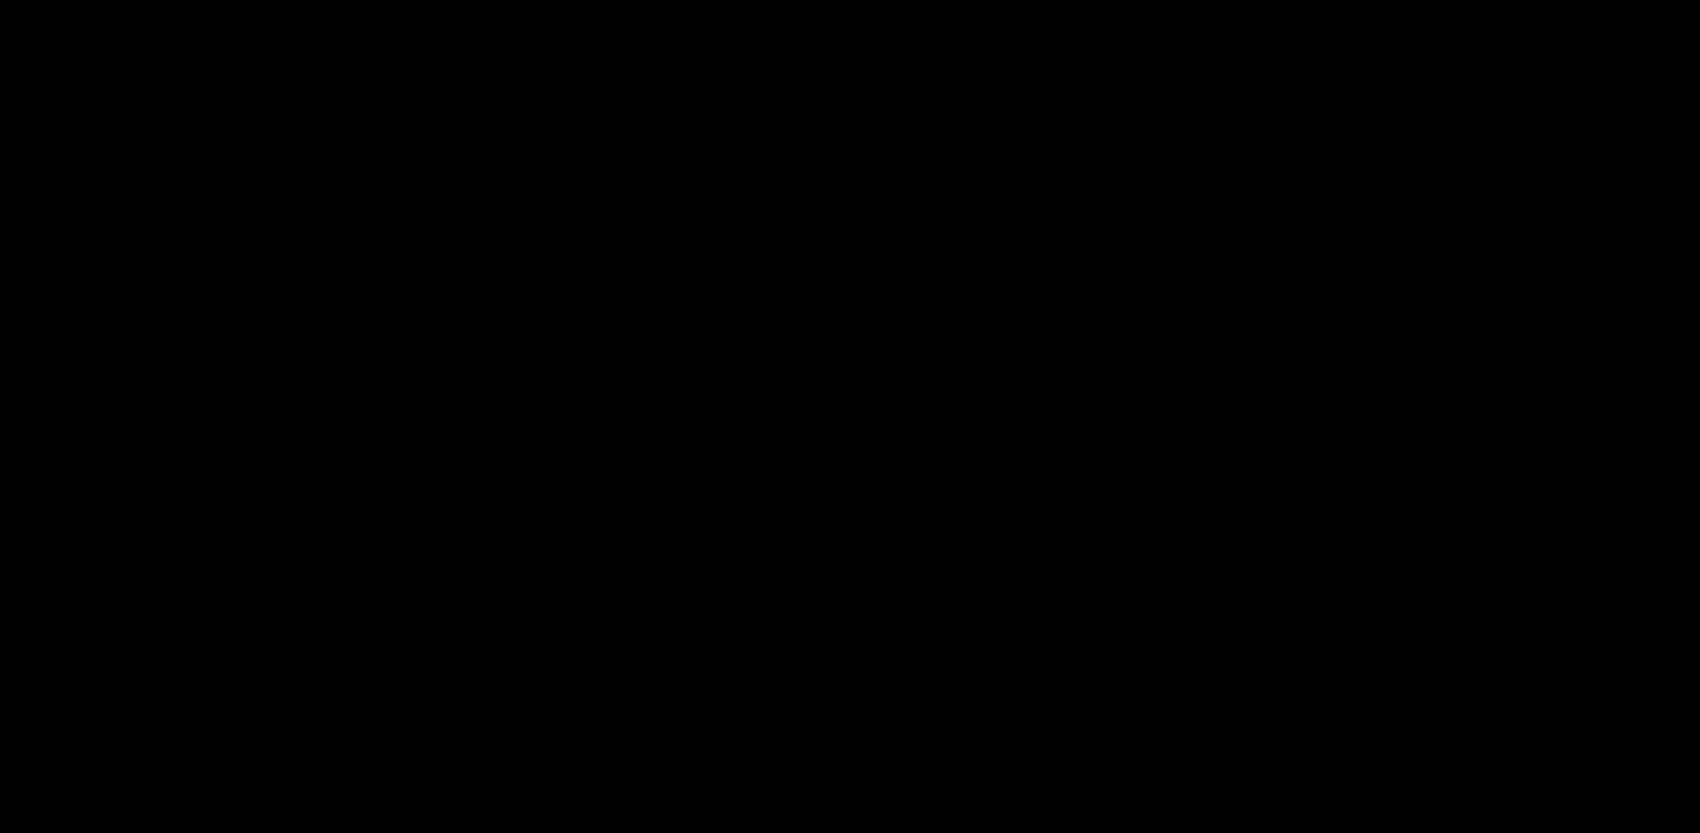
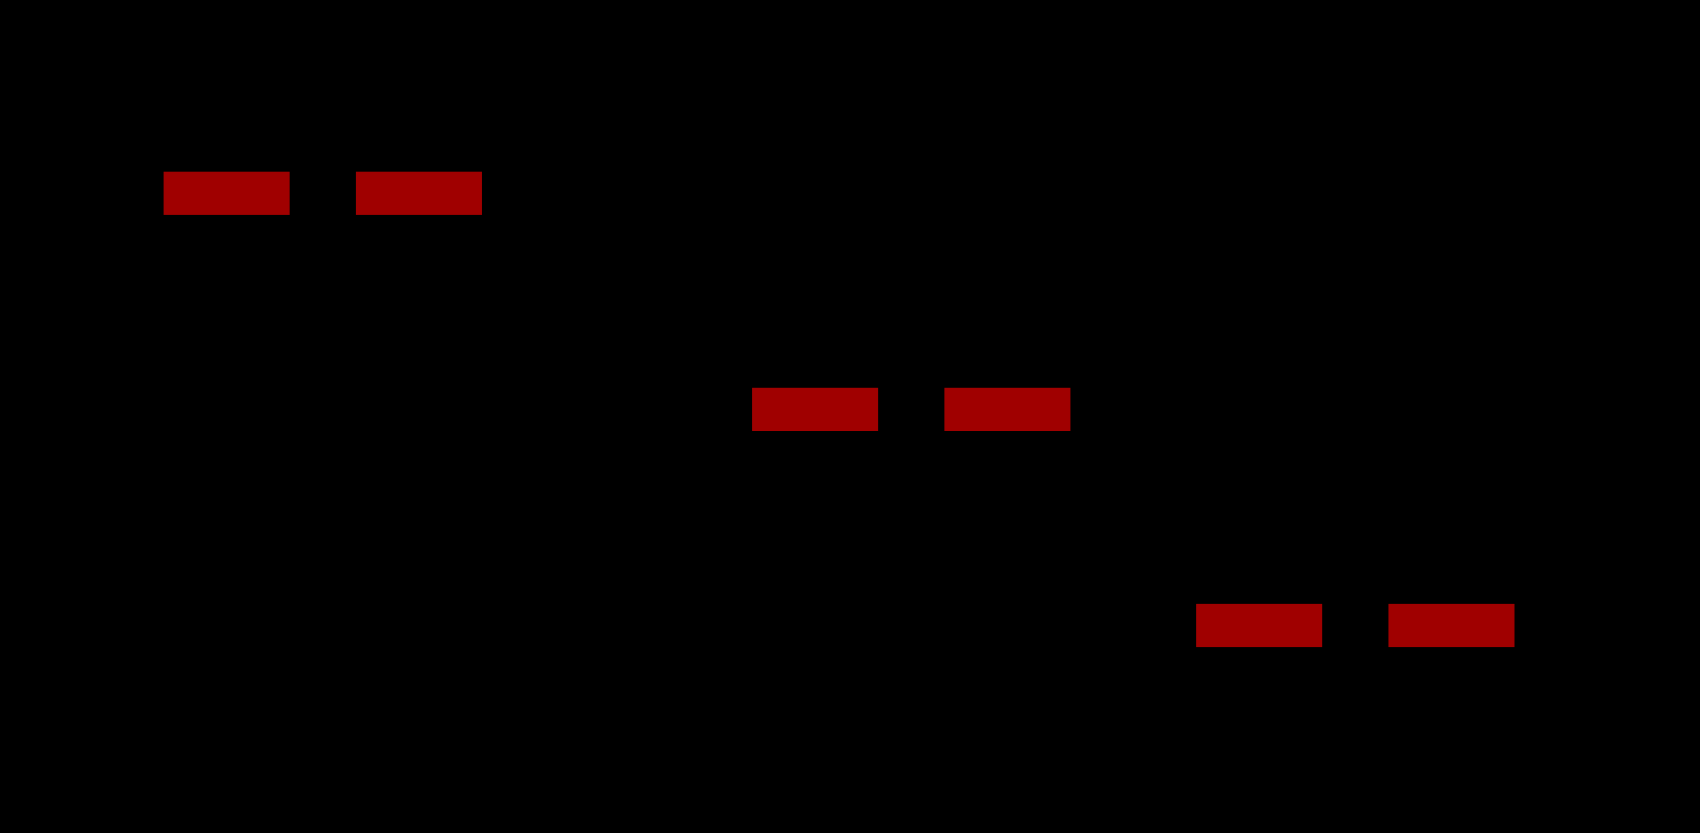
part: none -> (322, 193)
part: none -> (911, 409)
part: none -> (1355, 625)

